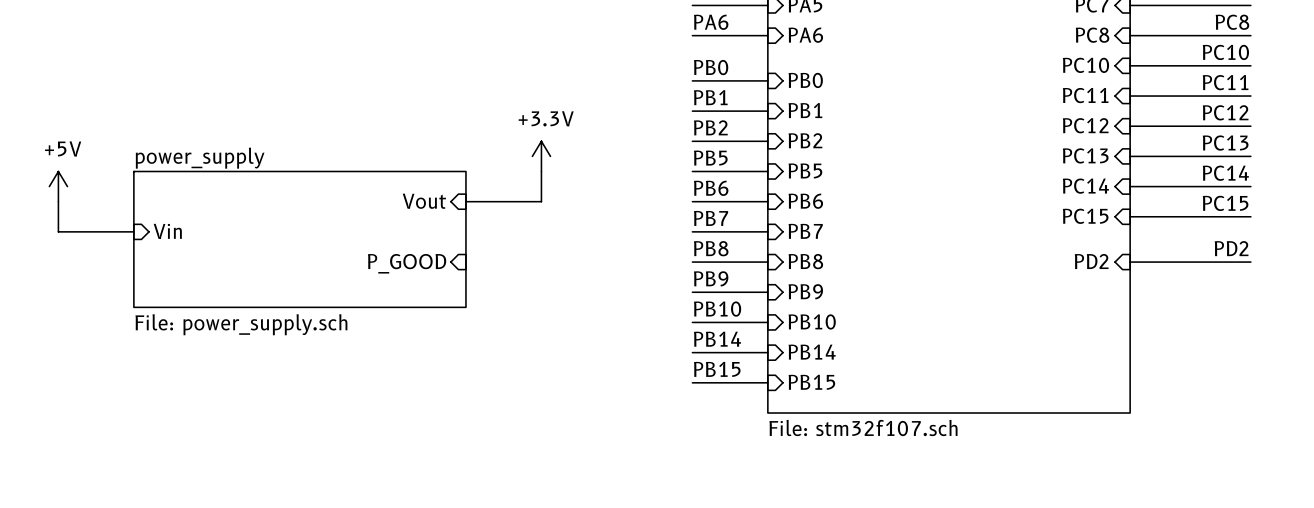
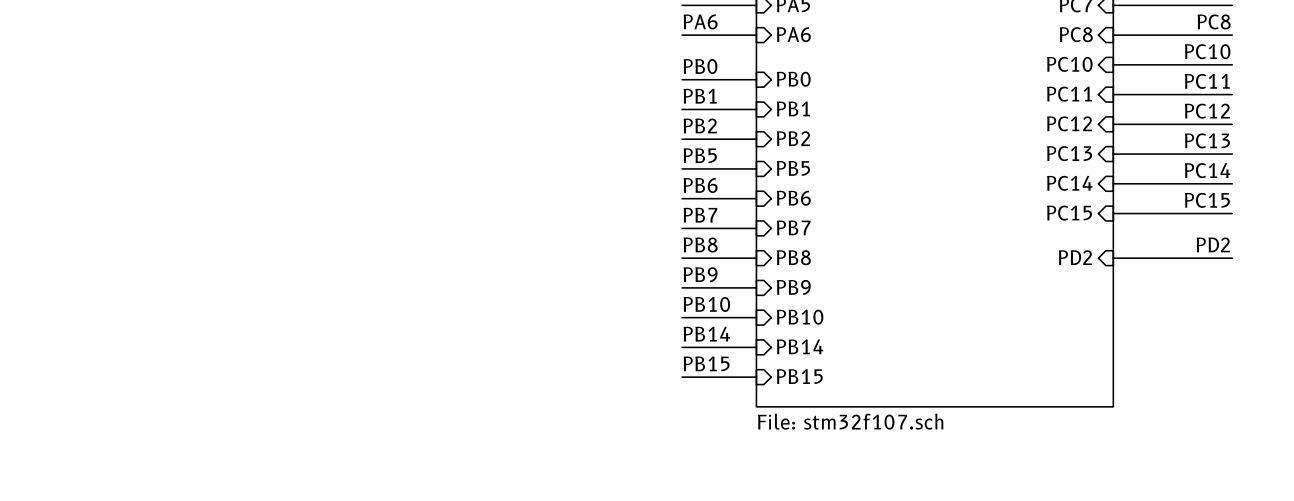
power symbol: +3.3V (541, 156) -> none
wire: (541, 171) (541, 201) (465, 201) -> none
power symbol: +5V (58, 186) -> none
wire: (58, 201) (58, 231) (133, 231) -> none
sheet pin: Vout (424, 201) -> none
sheet pin: Vin (167, 231) -> none
sheet power_supply: File: power_supply.sch (299, 239) -> none
sheet pin: P_GOOD (407, 263) -> none

